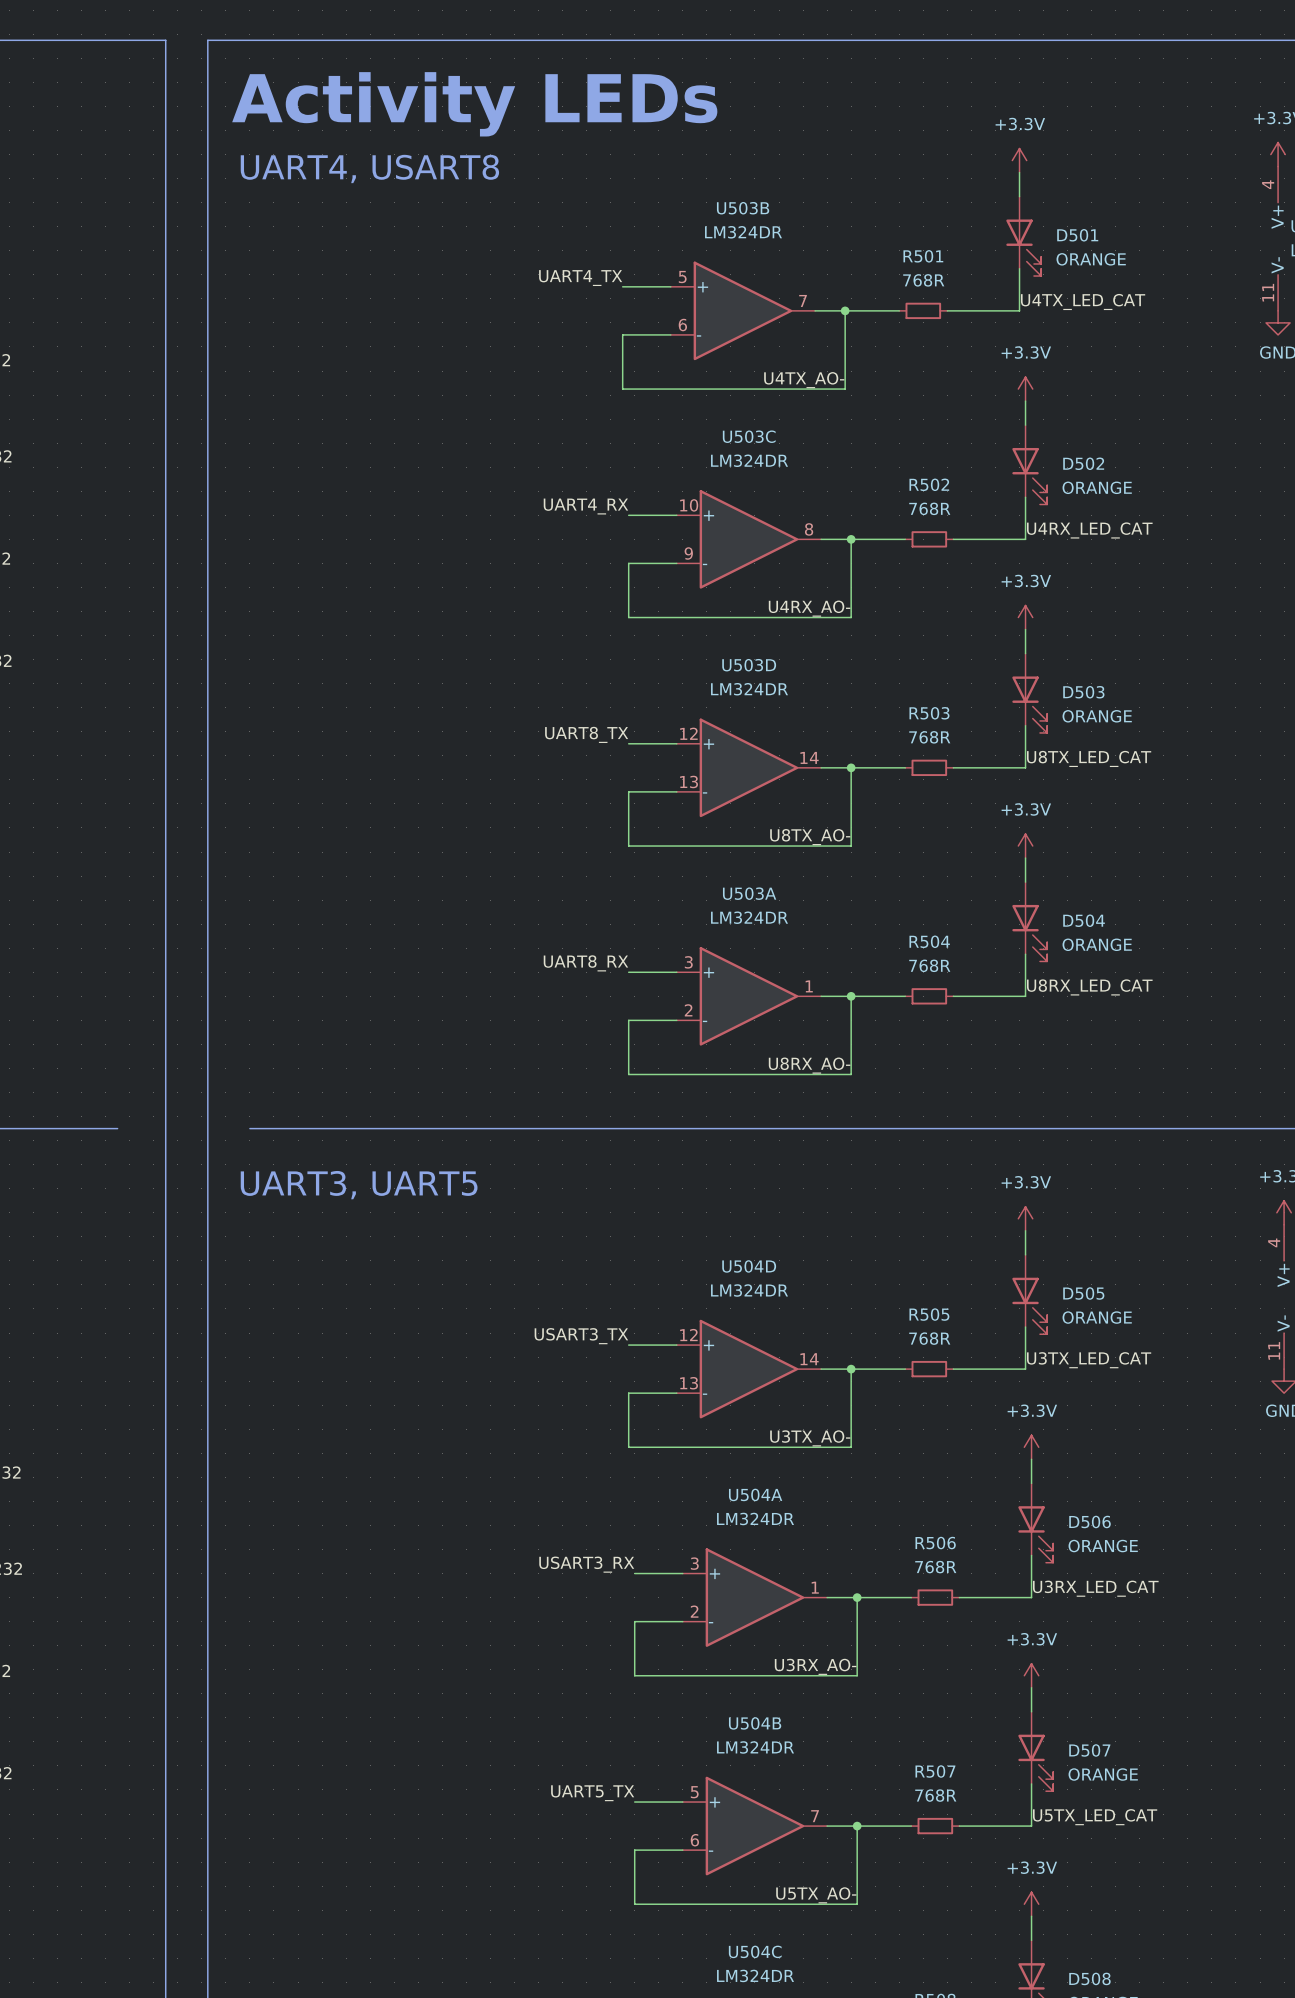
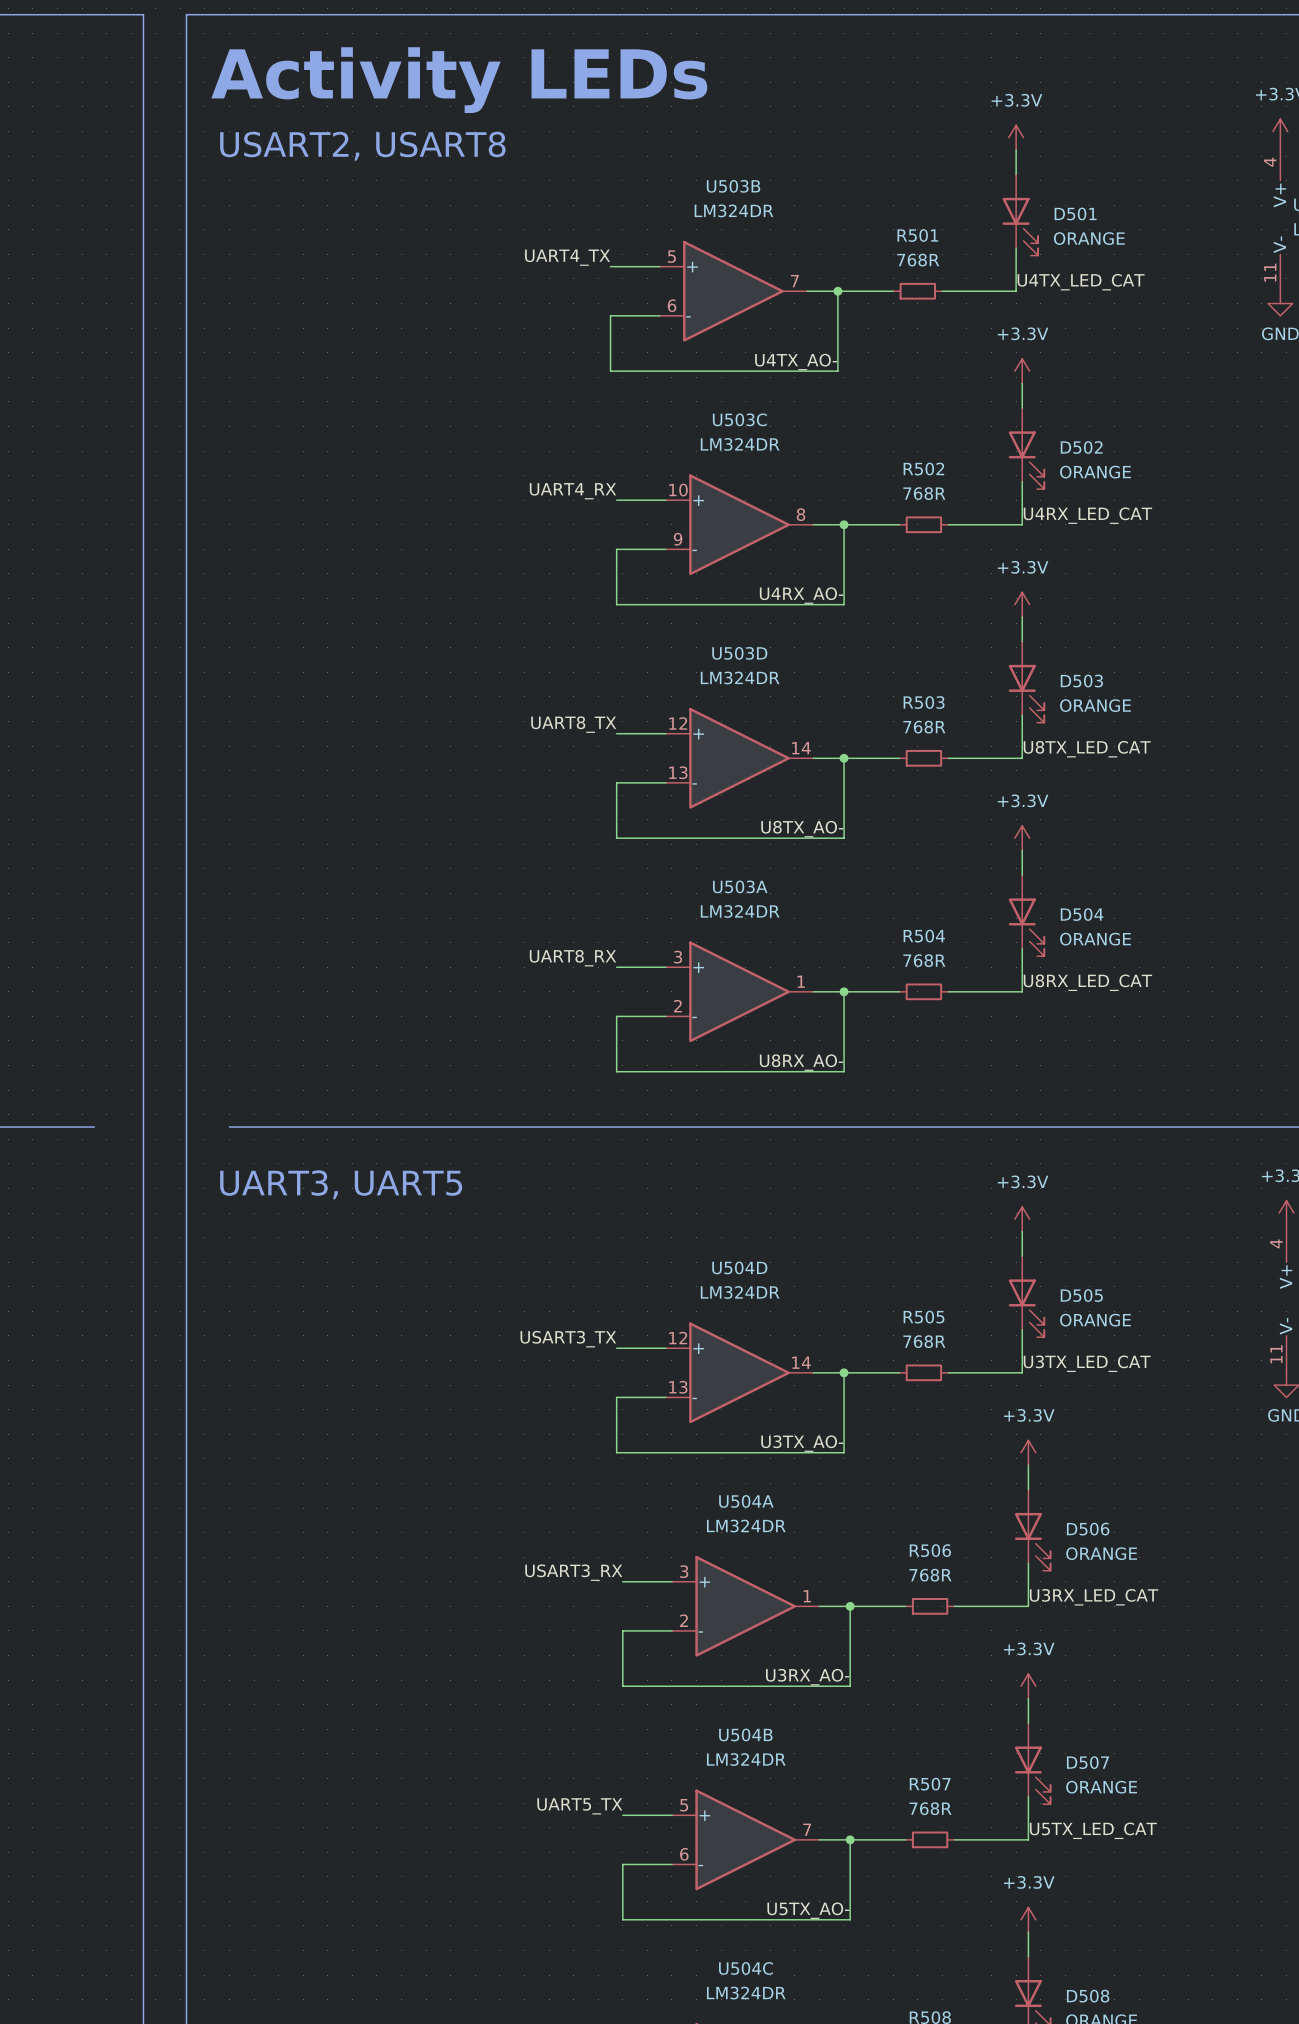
text: UART4, USART8 (369, 168) -> USART2, USART8 (362, 146)

